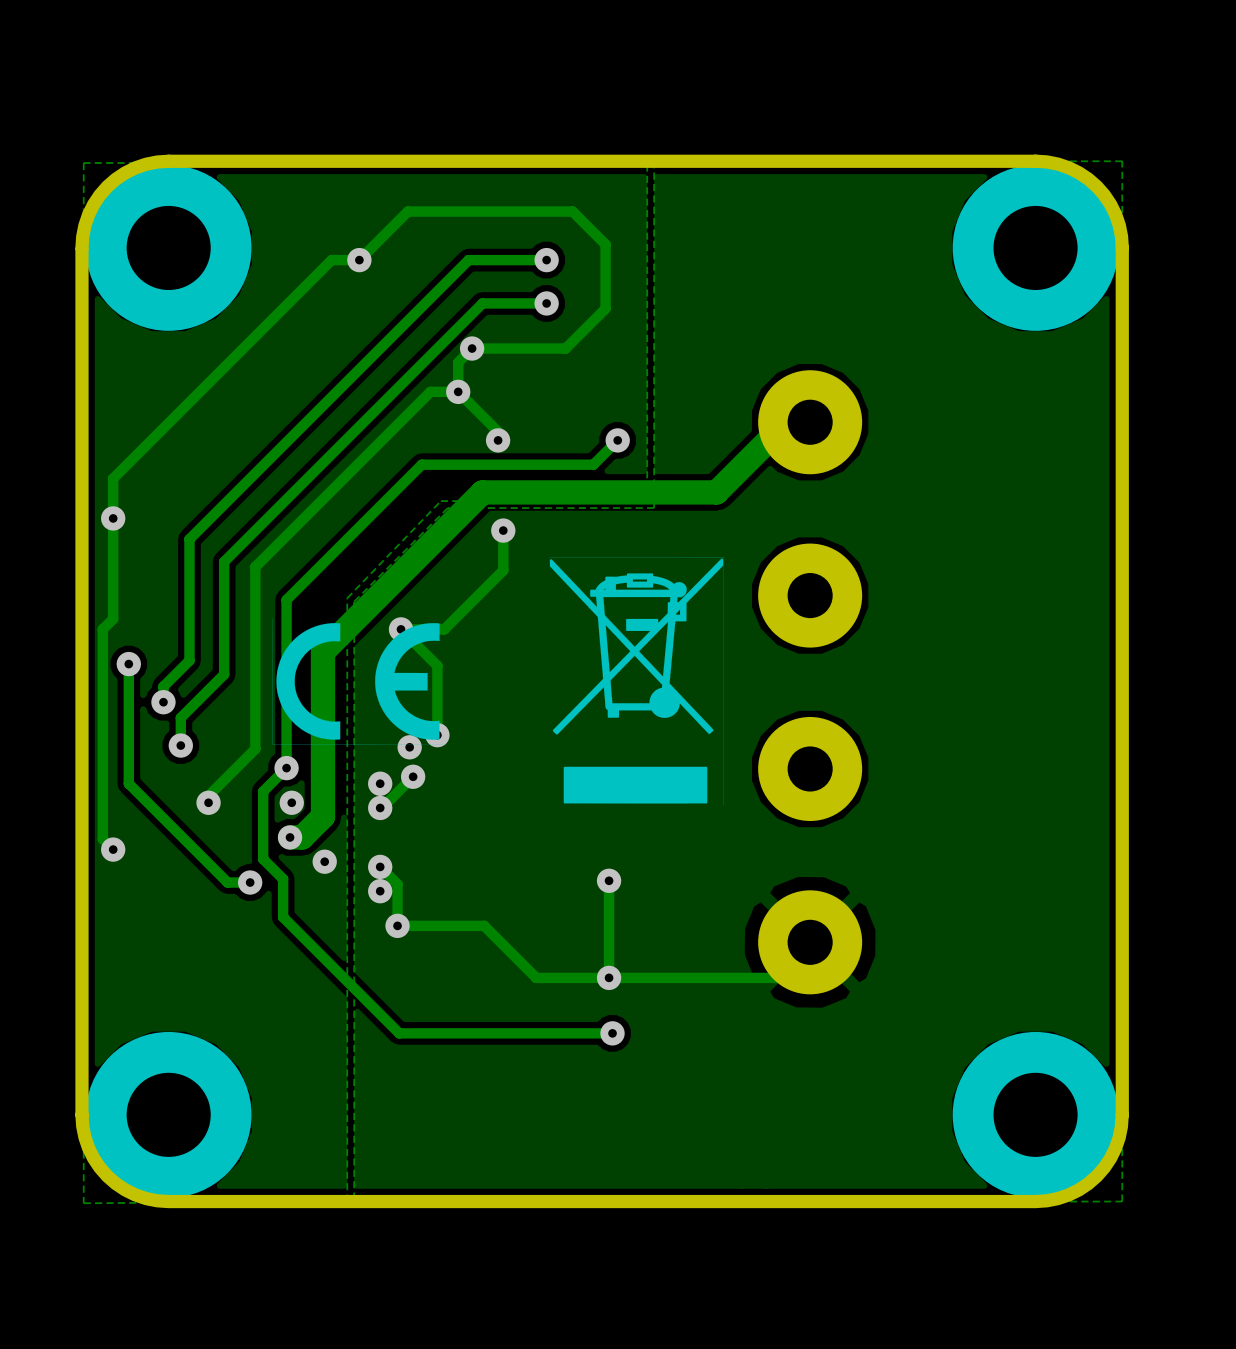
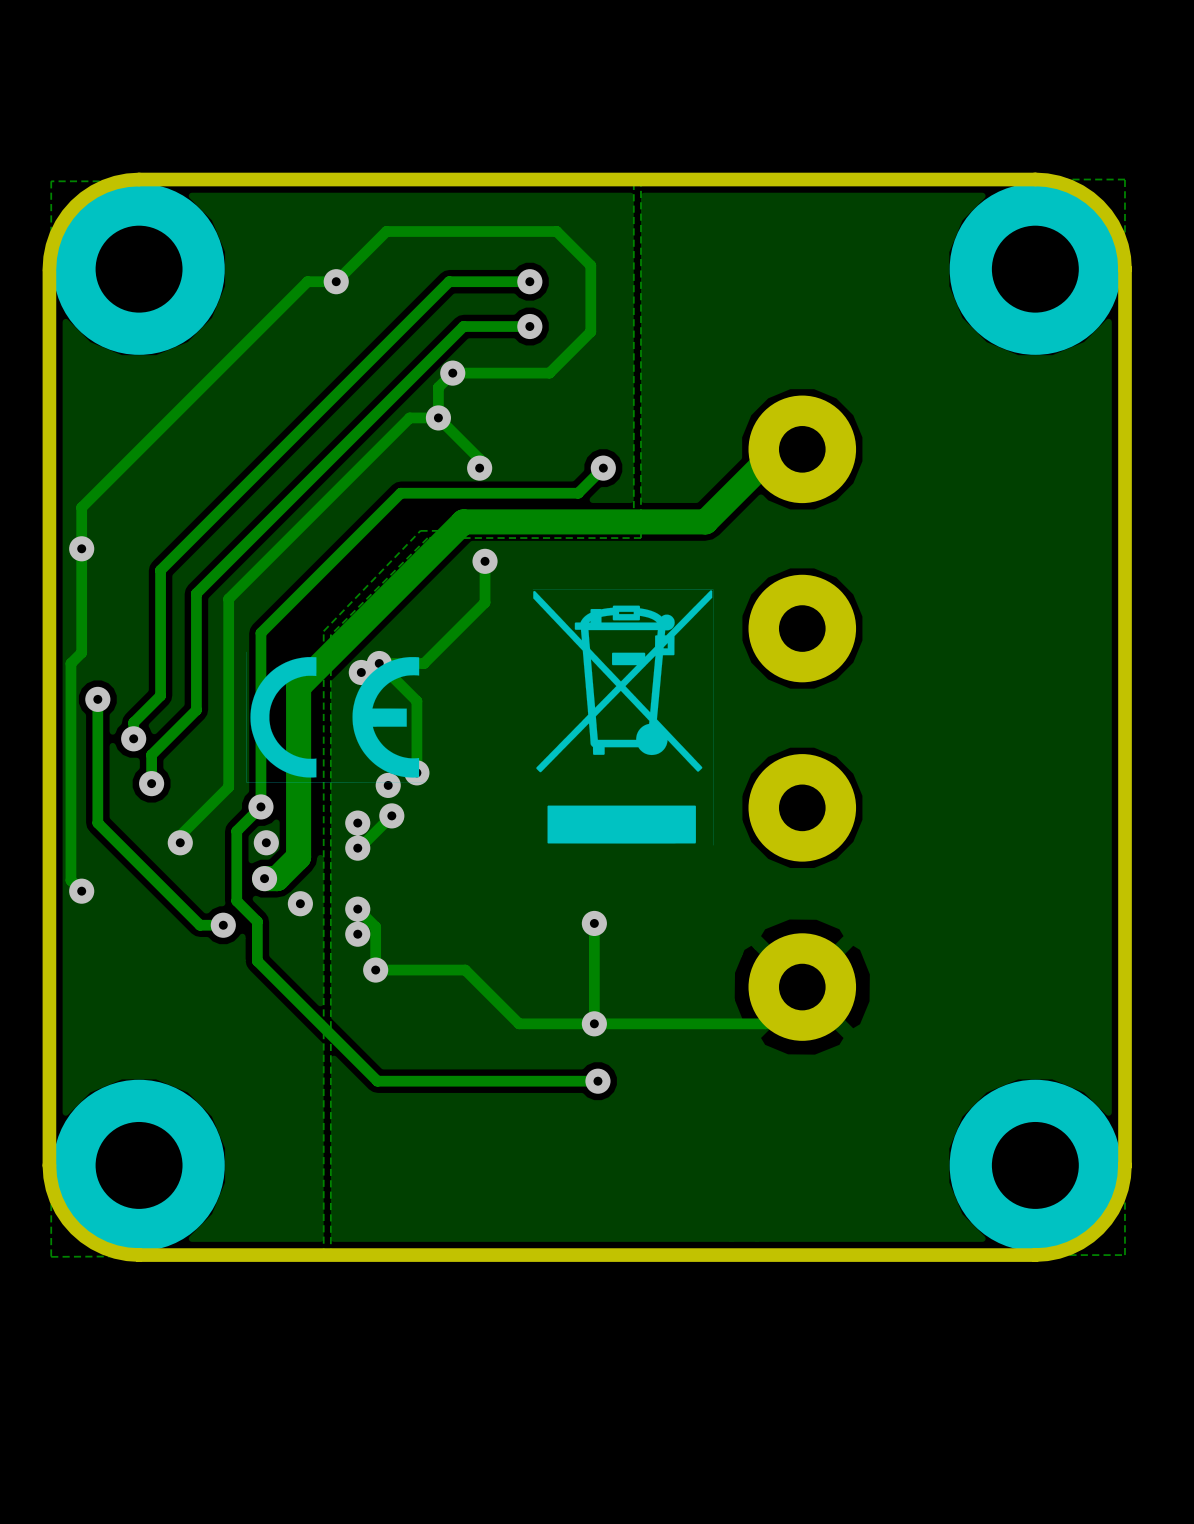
via: none -> (361, 672)

